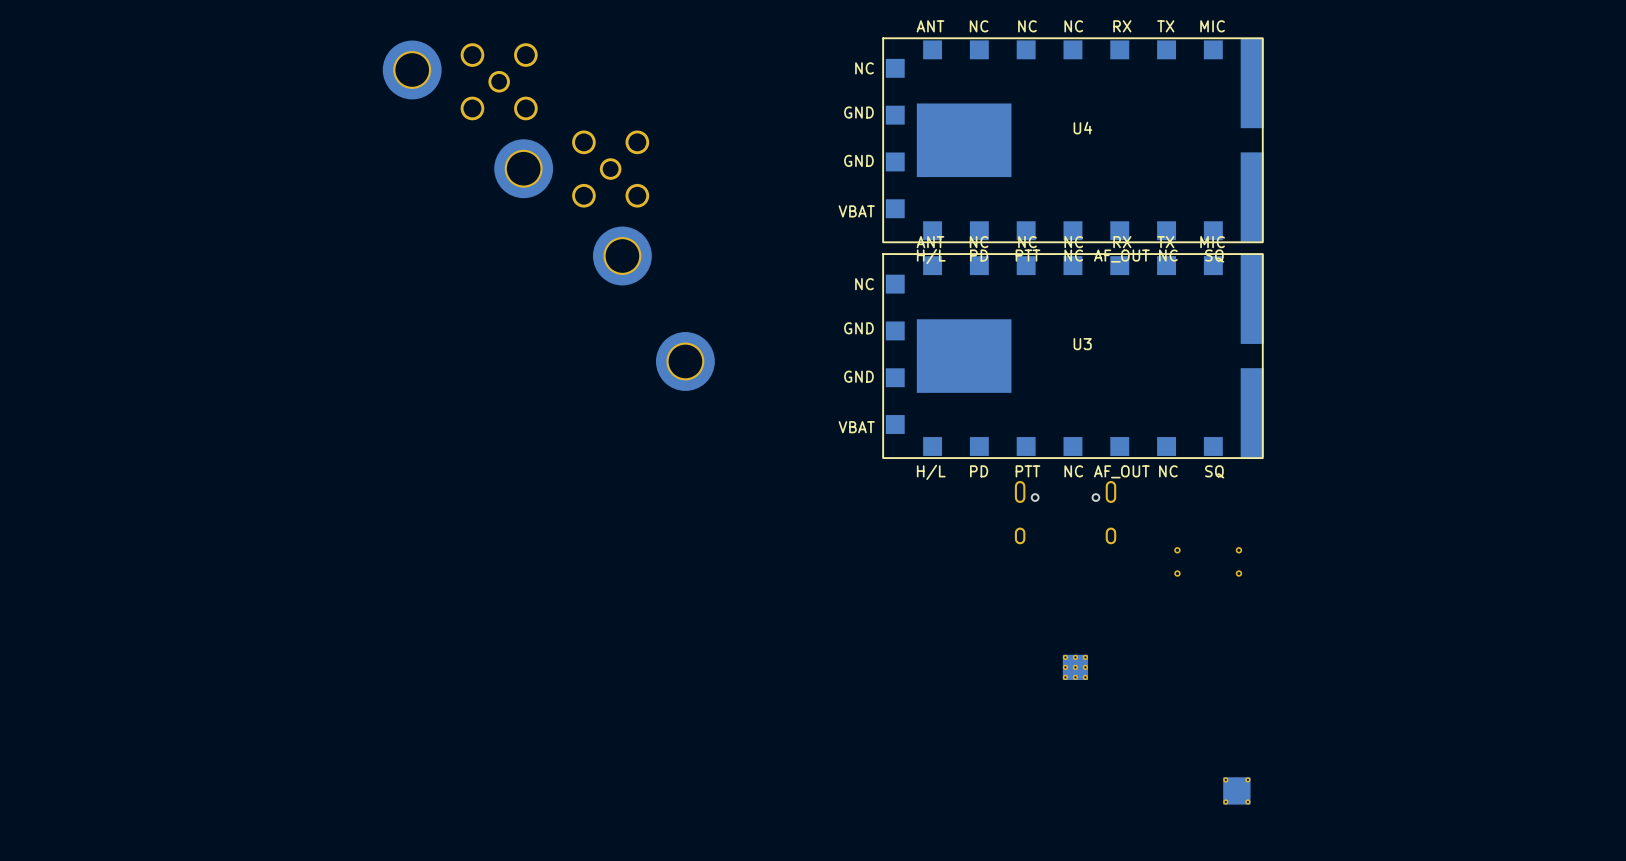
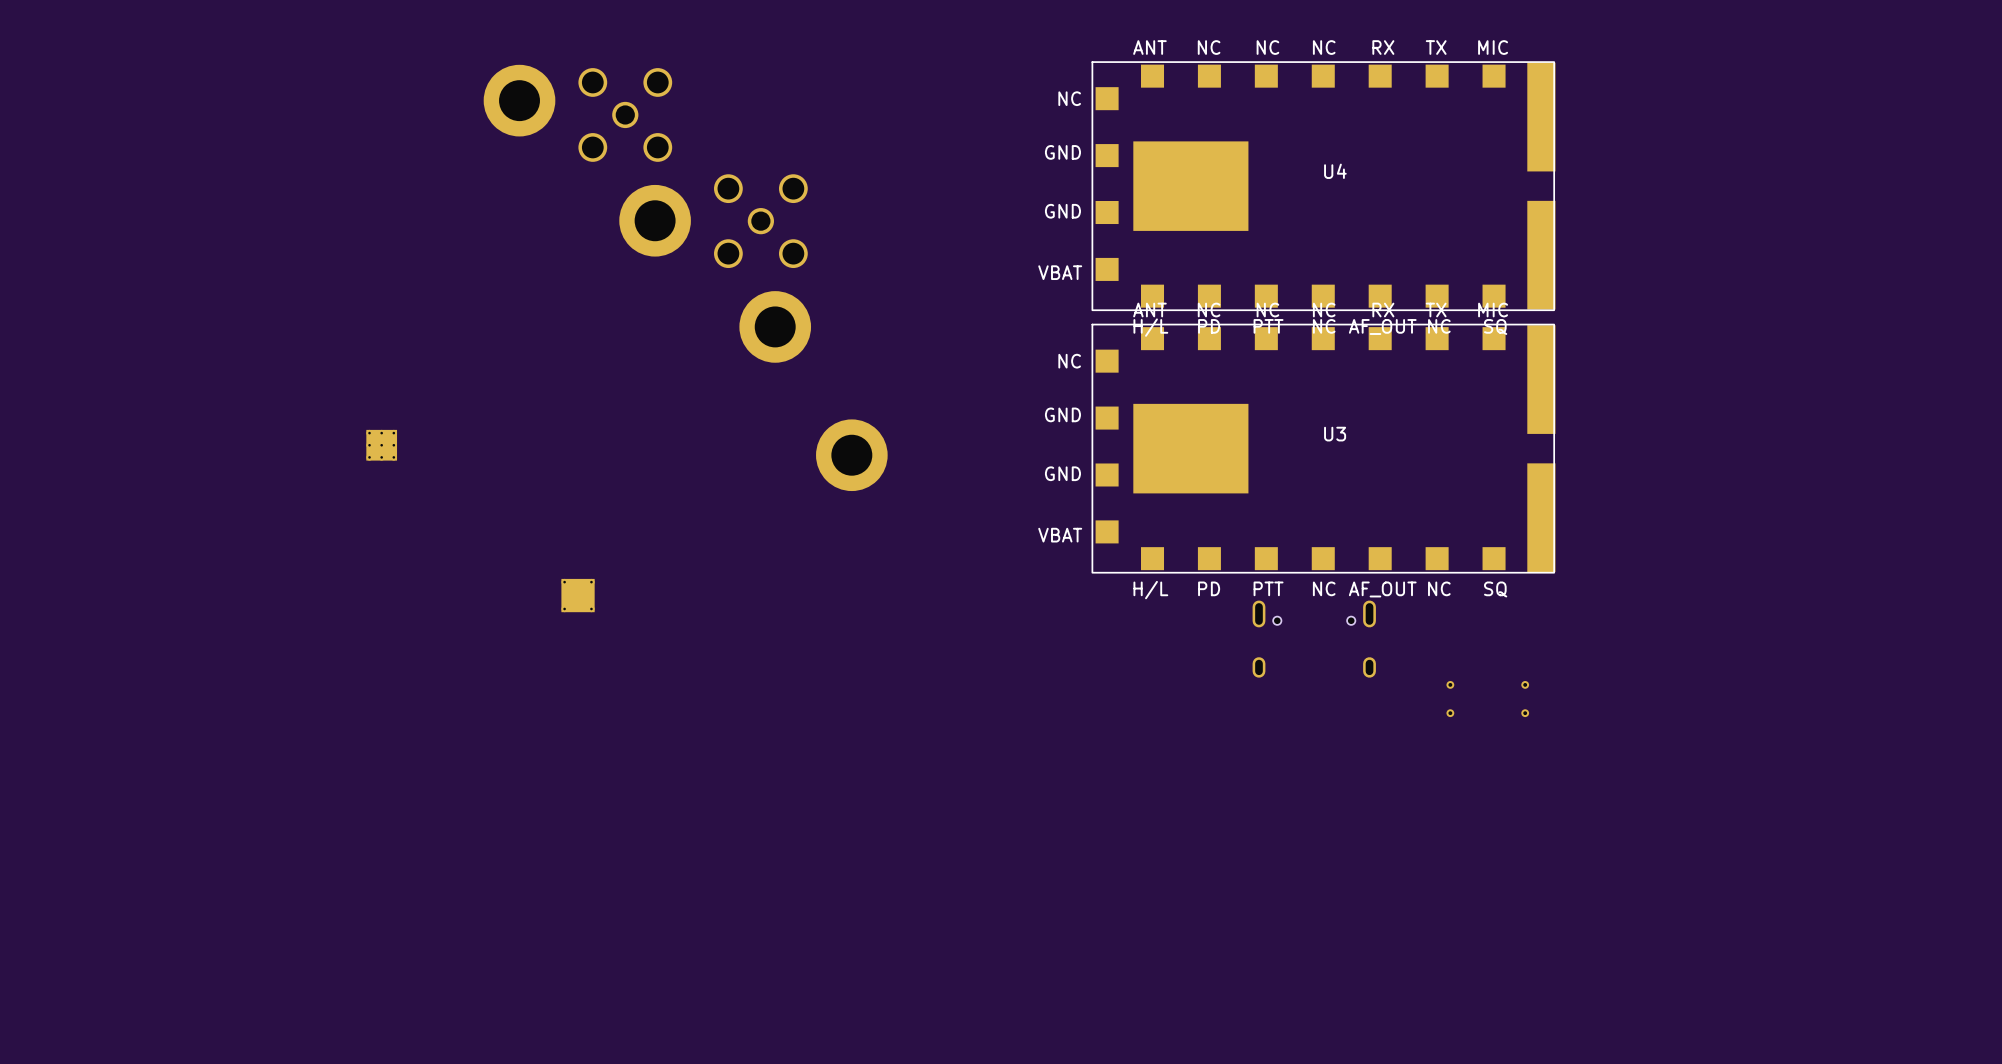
part: none -> (381, 445)
part: none -> (578, 595)
part: (1075, 667) -> none
part: (1236, 790) -> none

